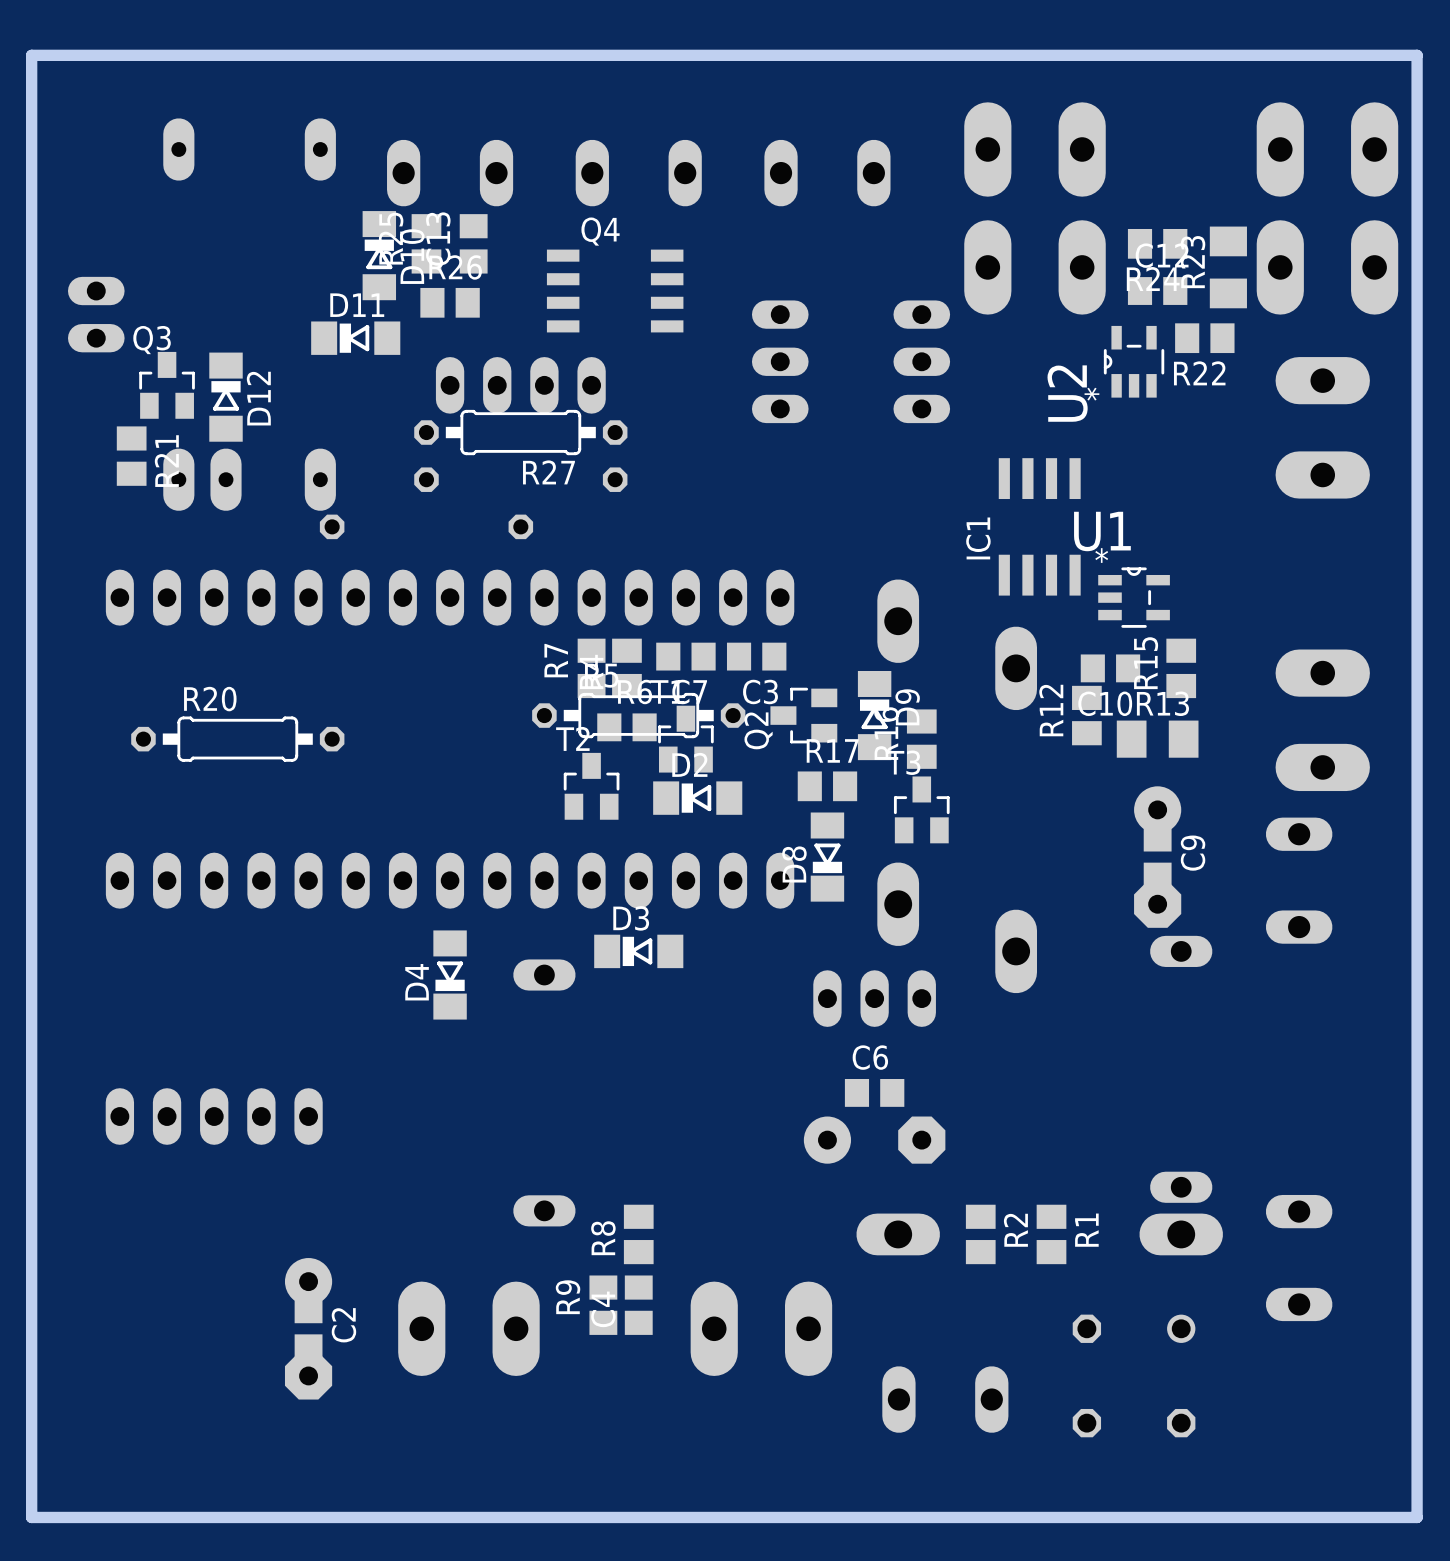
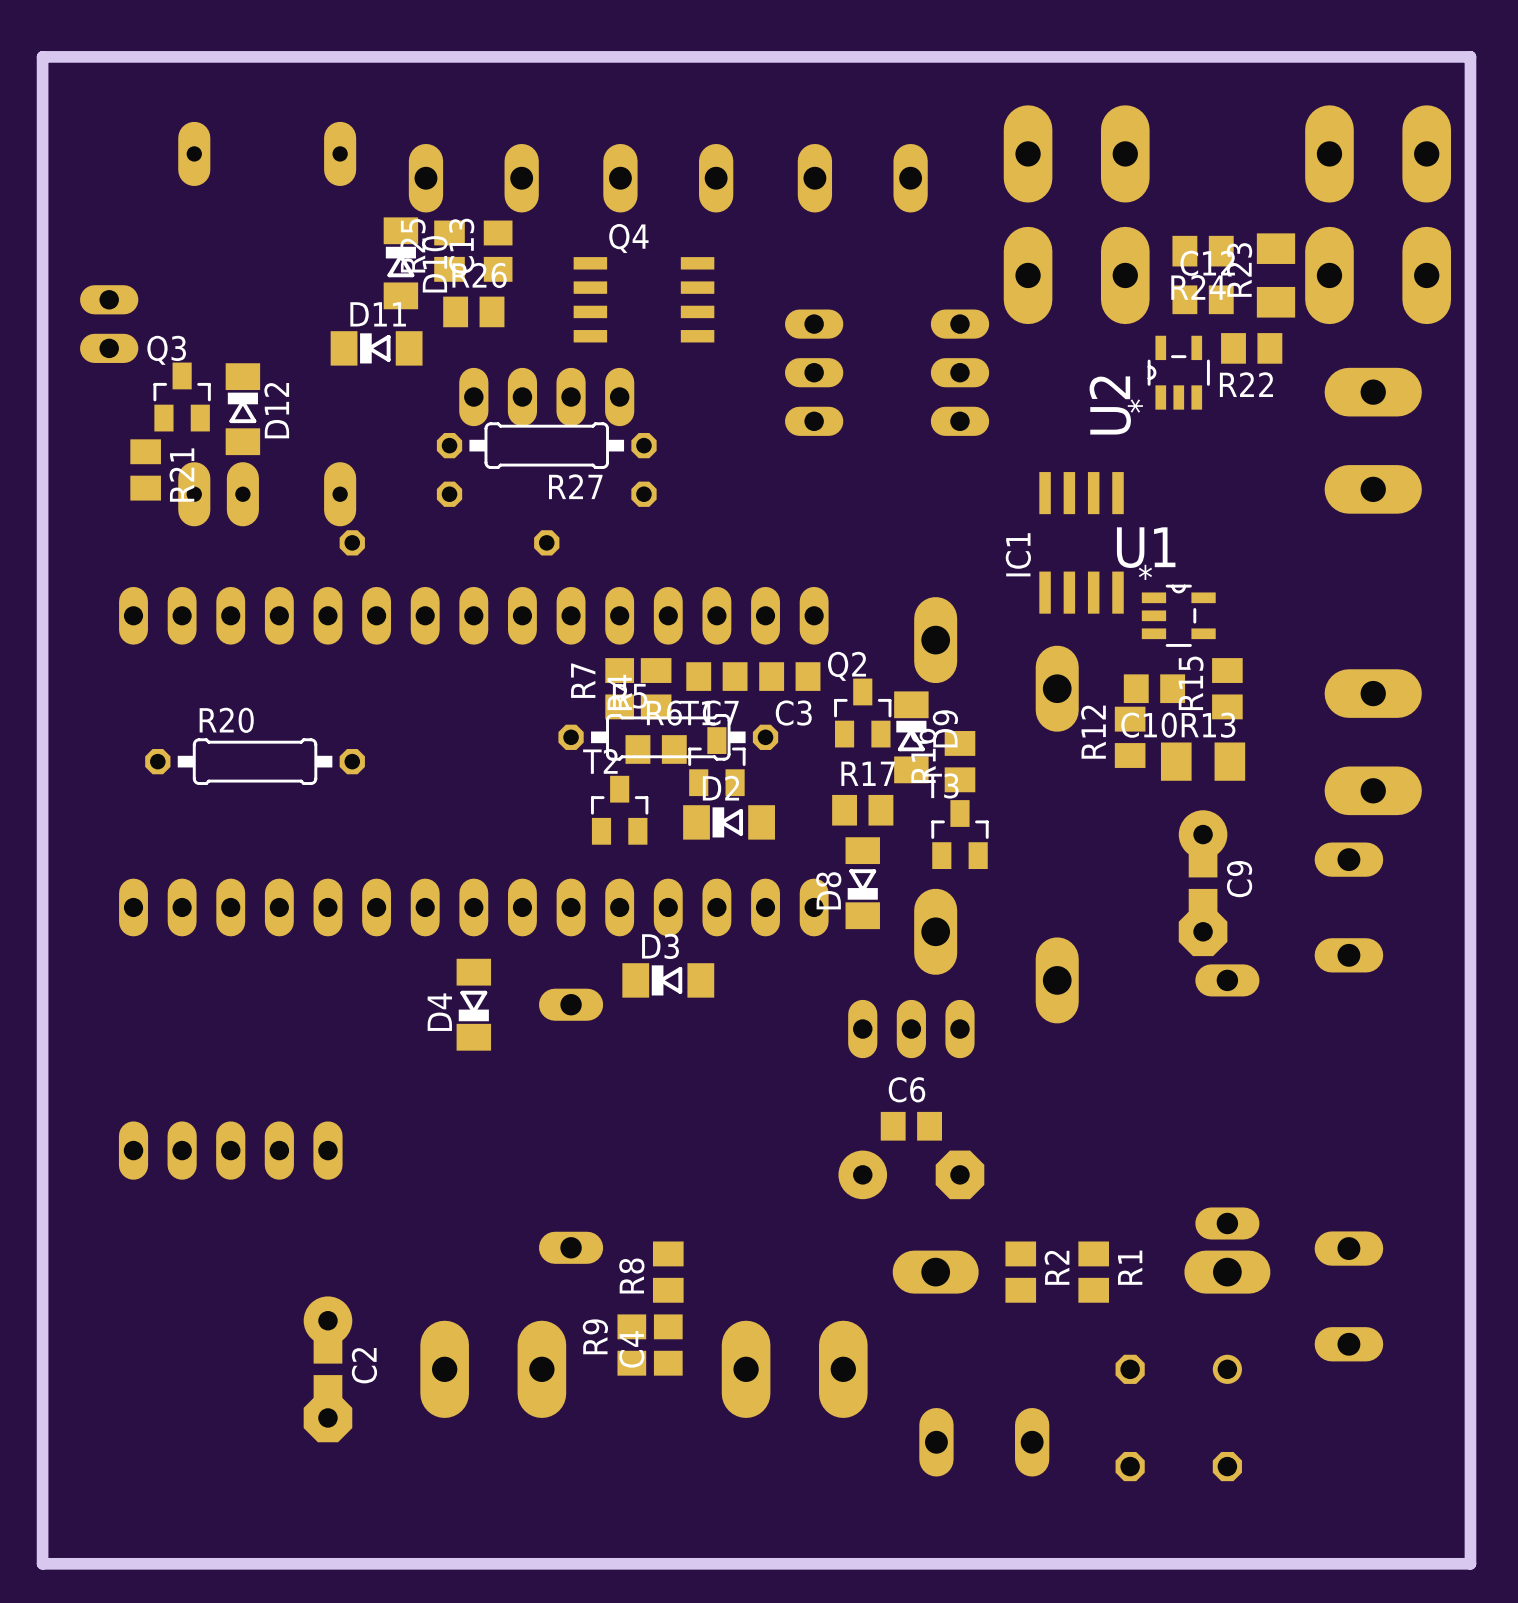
Q2 rotation: 0° (803, 715) -> 90° clockwise (862, 713)

